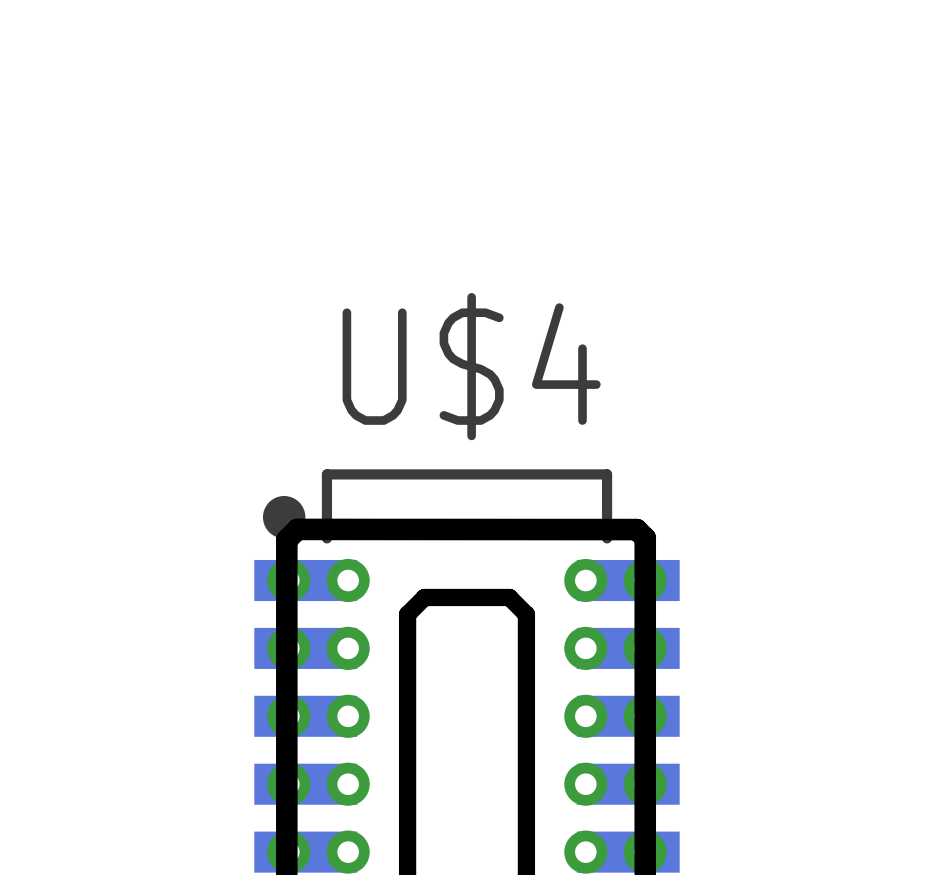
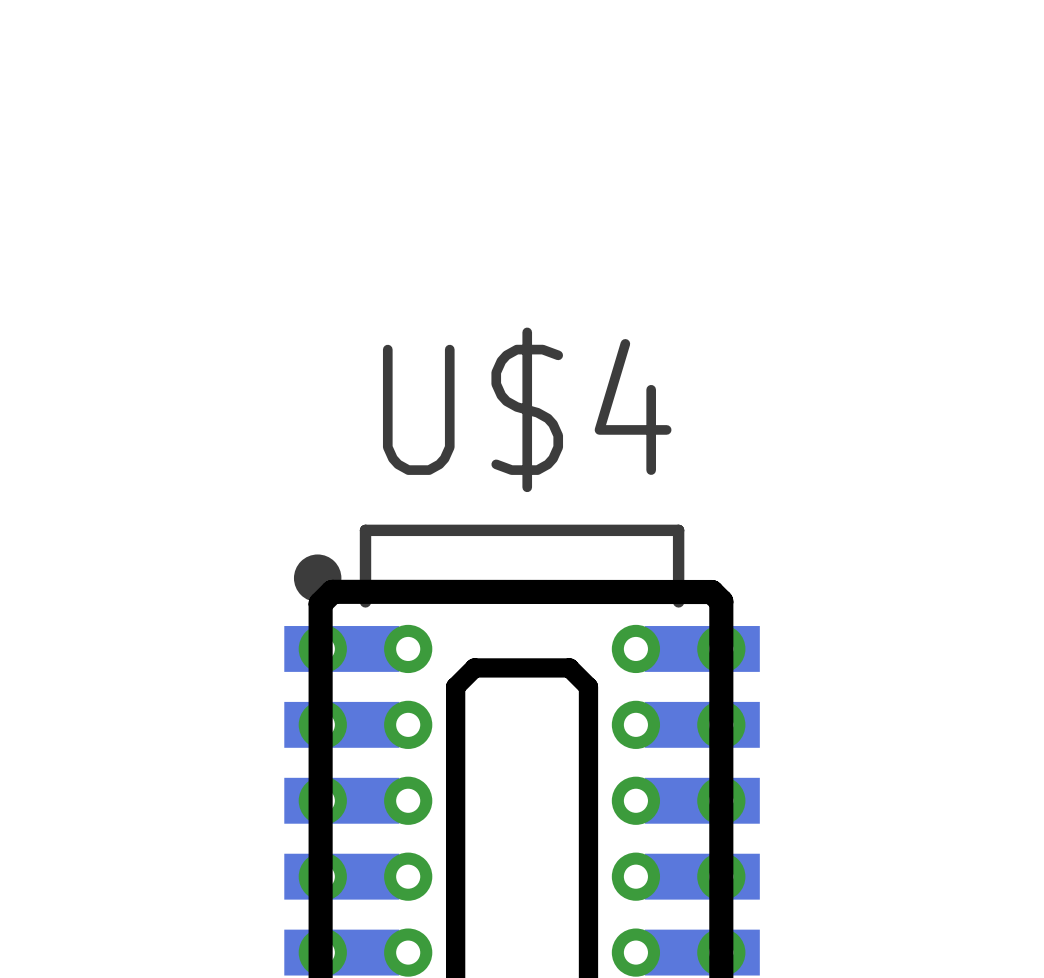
via position: (348, 580) -> (408, 648)
via position: (585, 580) -> (635, 648)
via position: (348, 648) -> (408, 724)
via position: (585, 648) -> (635, 724)
via position: (348, 716) -> (408, 800)
via position: (585, 716) -> (635, 800)
via position: (348, 784) -> (408, 876)
via position: (585, 784) -> (635, 876)
via position: (348, 852) -> (408, 952)
via position: (585, 852) -> (635, 952)

